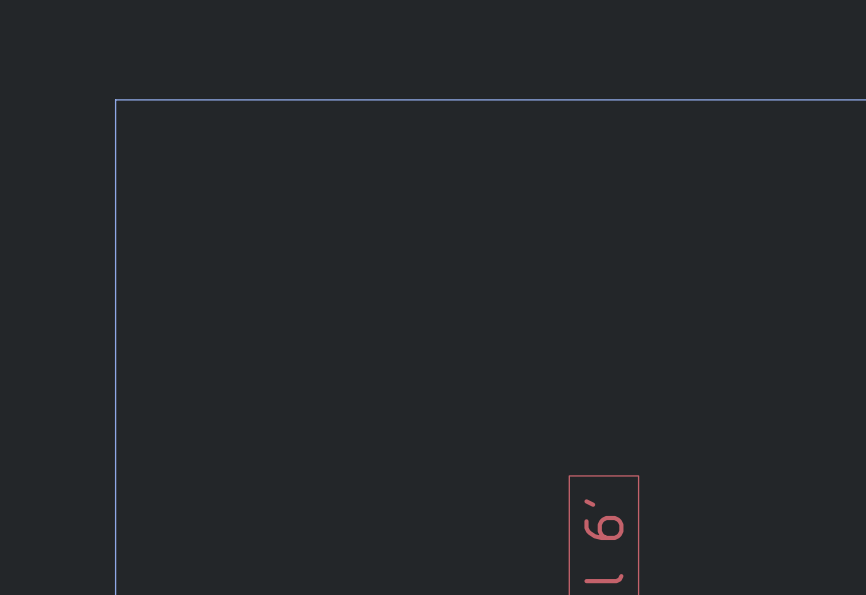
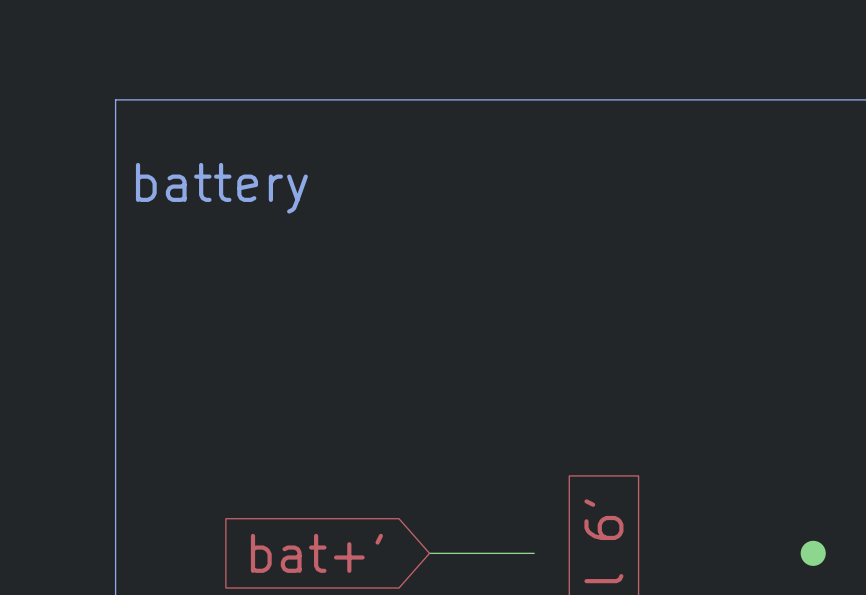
text: none -> battery (221, 188)
global label: none -> bat+' (316, 553)
wire: none -> (429, 553) (534, 553)
junction: none -> (813, 553)

